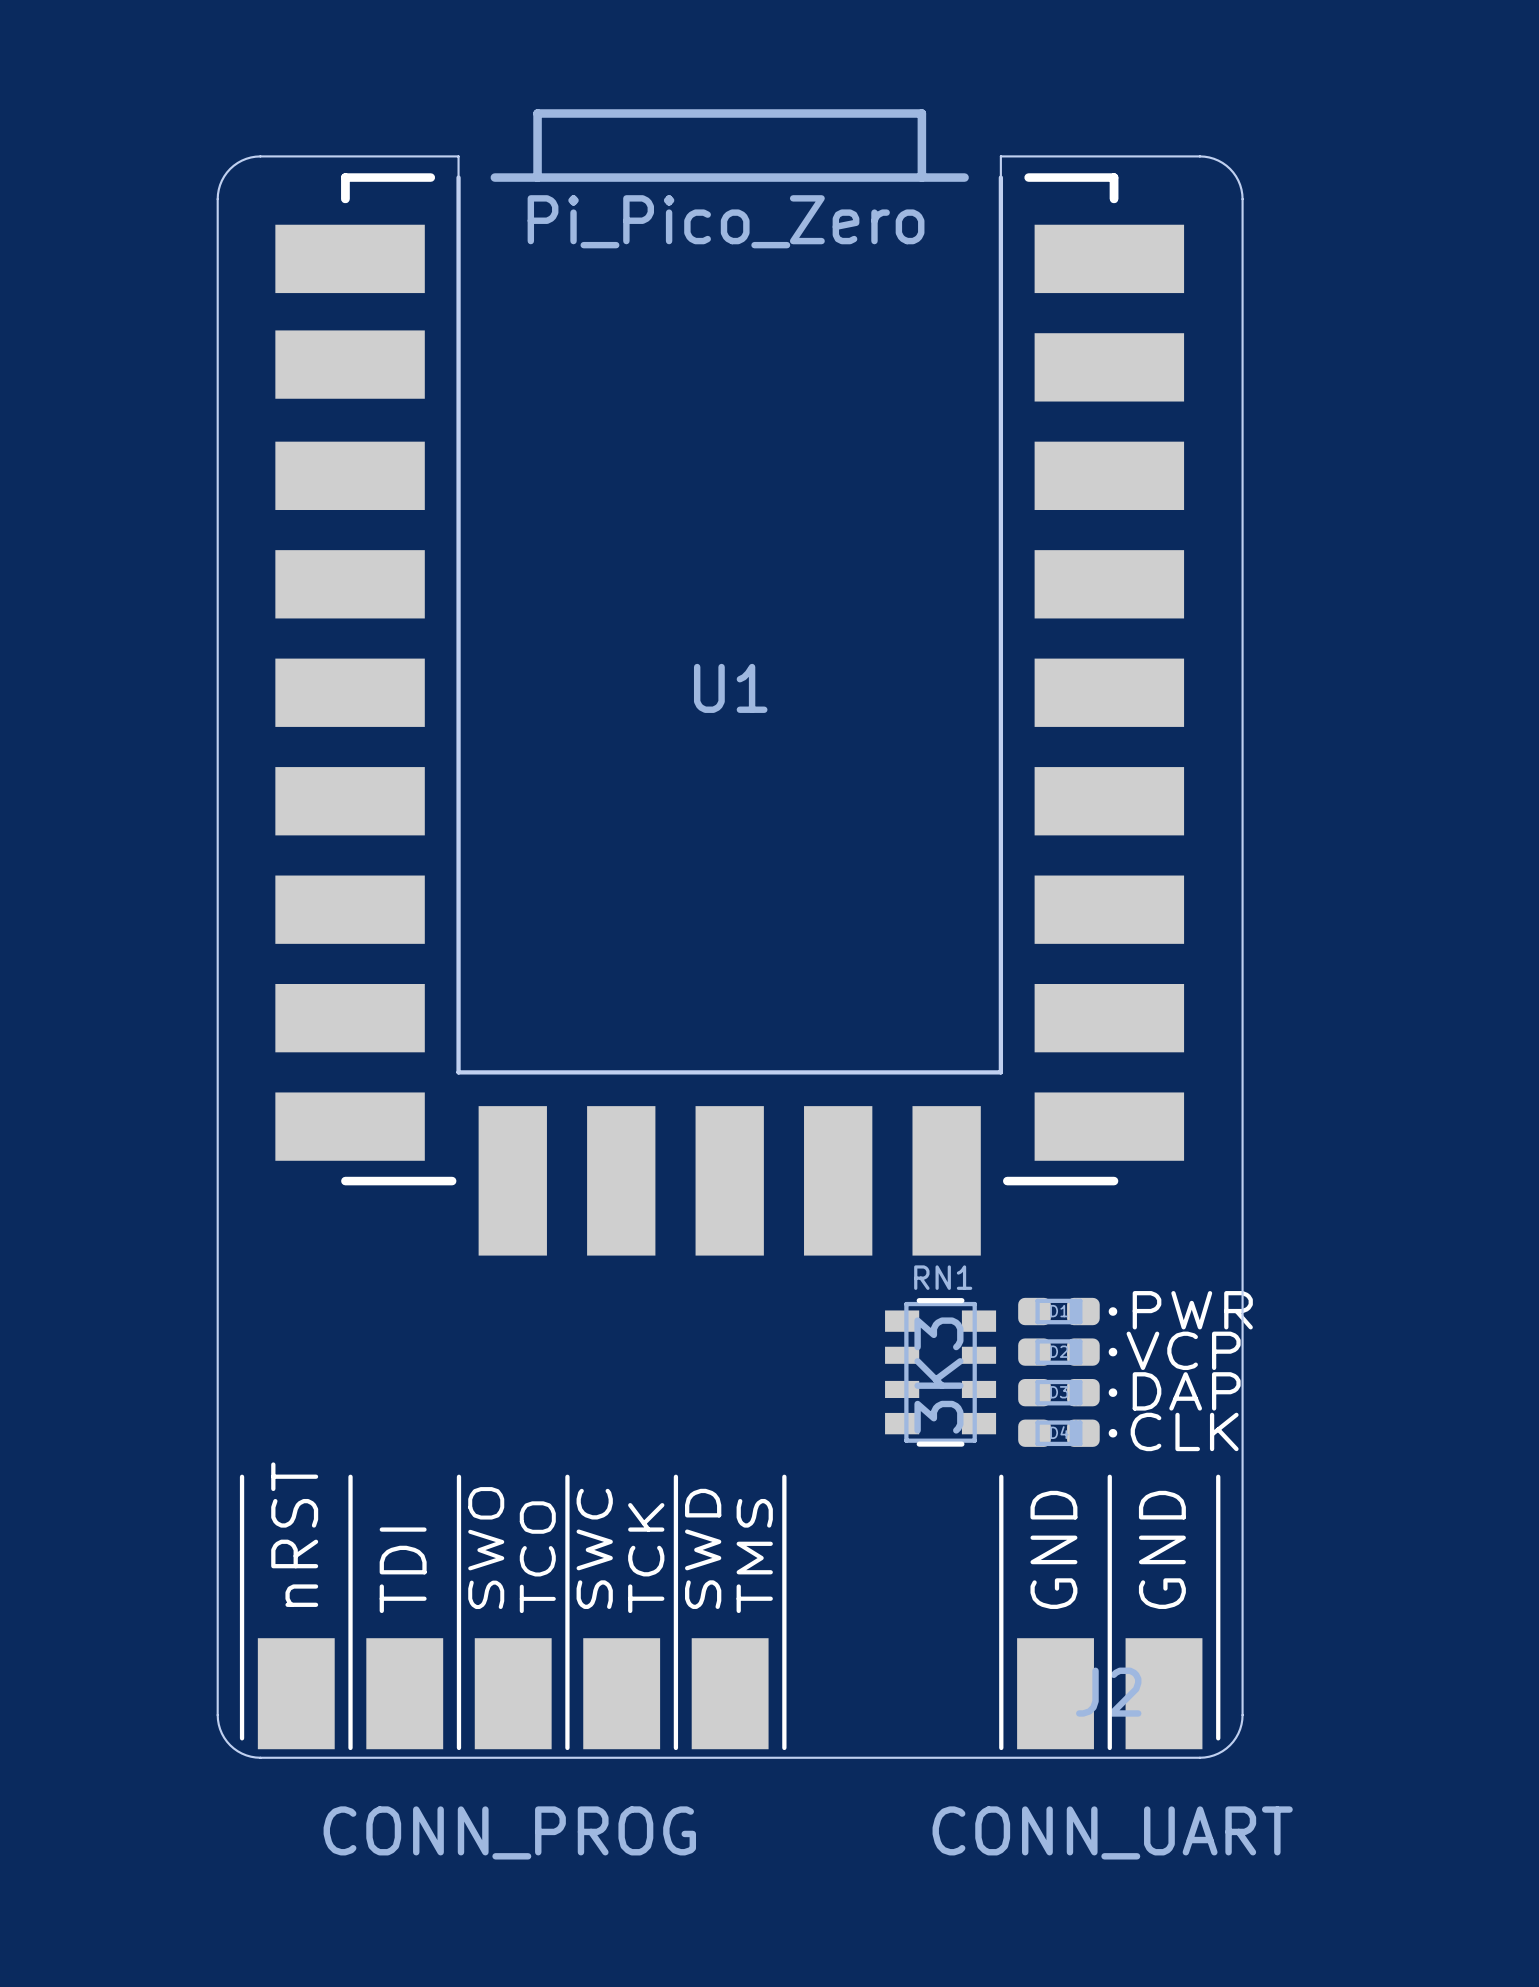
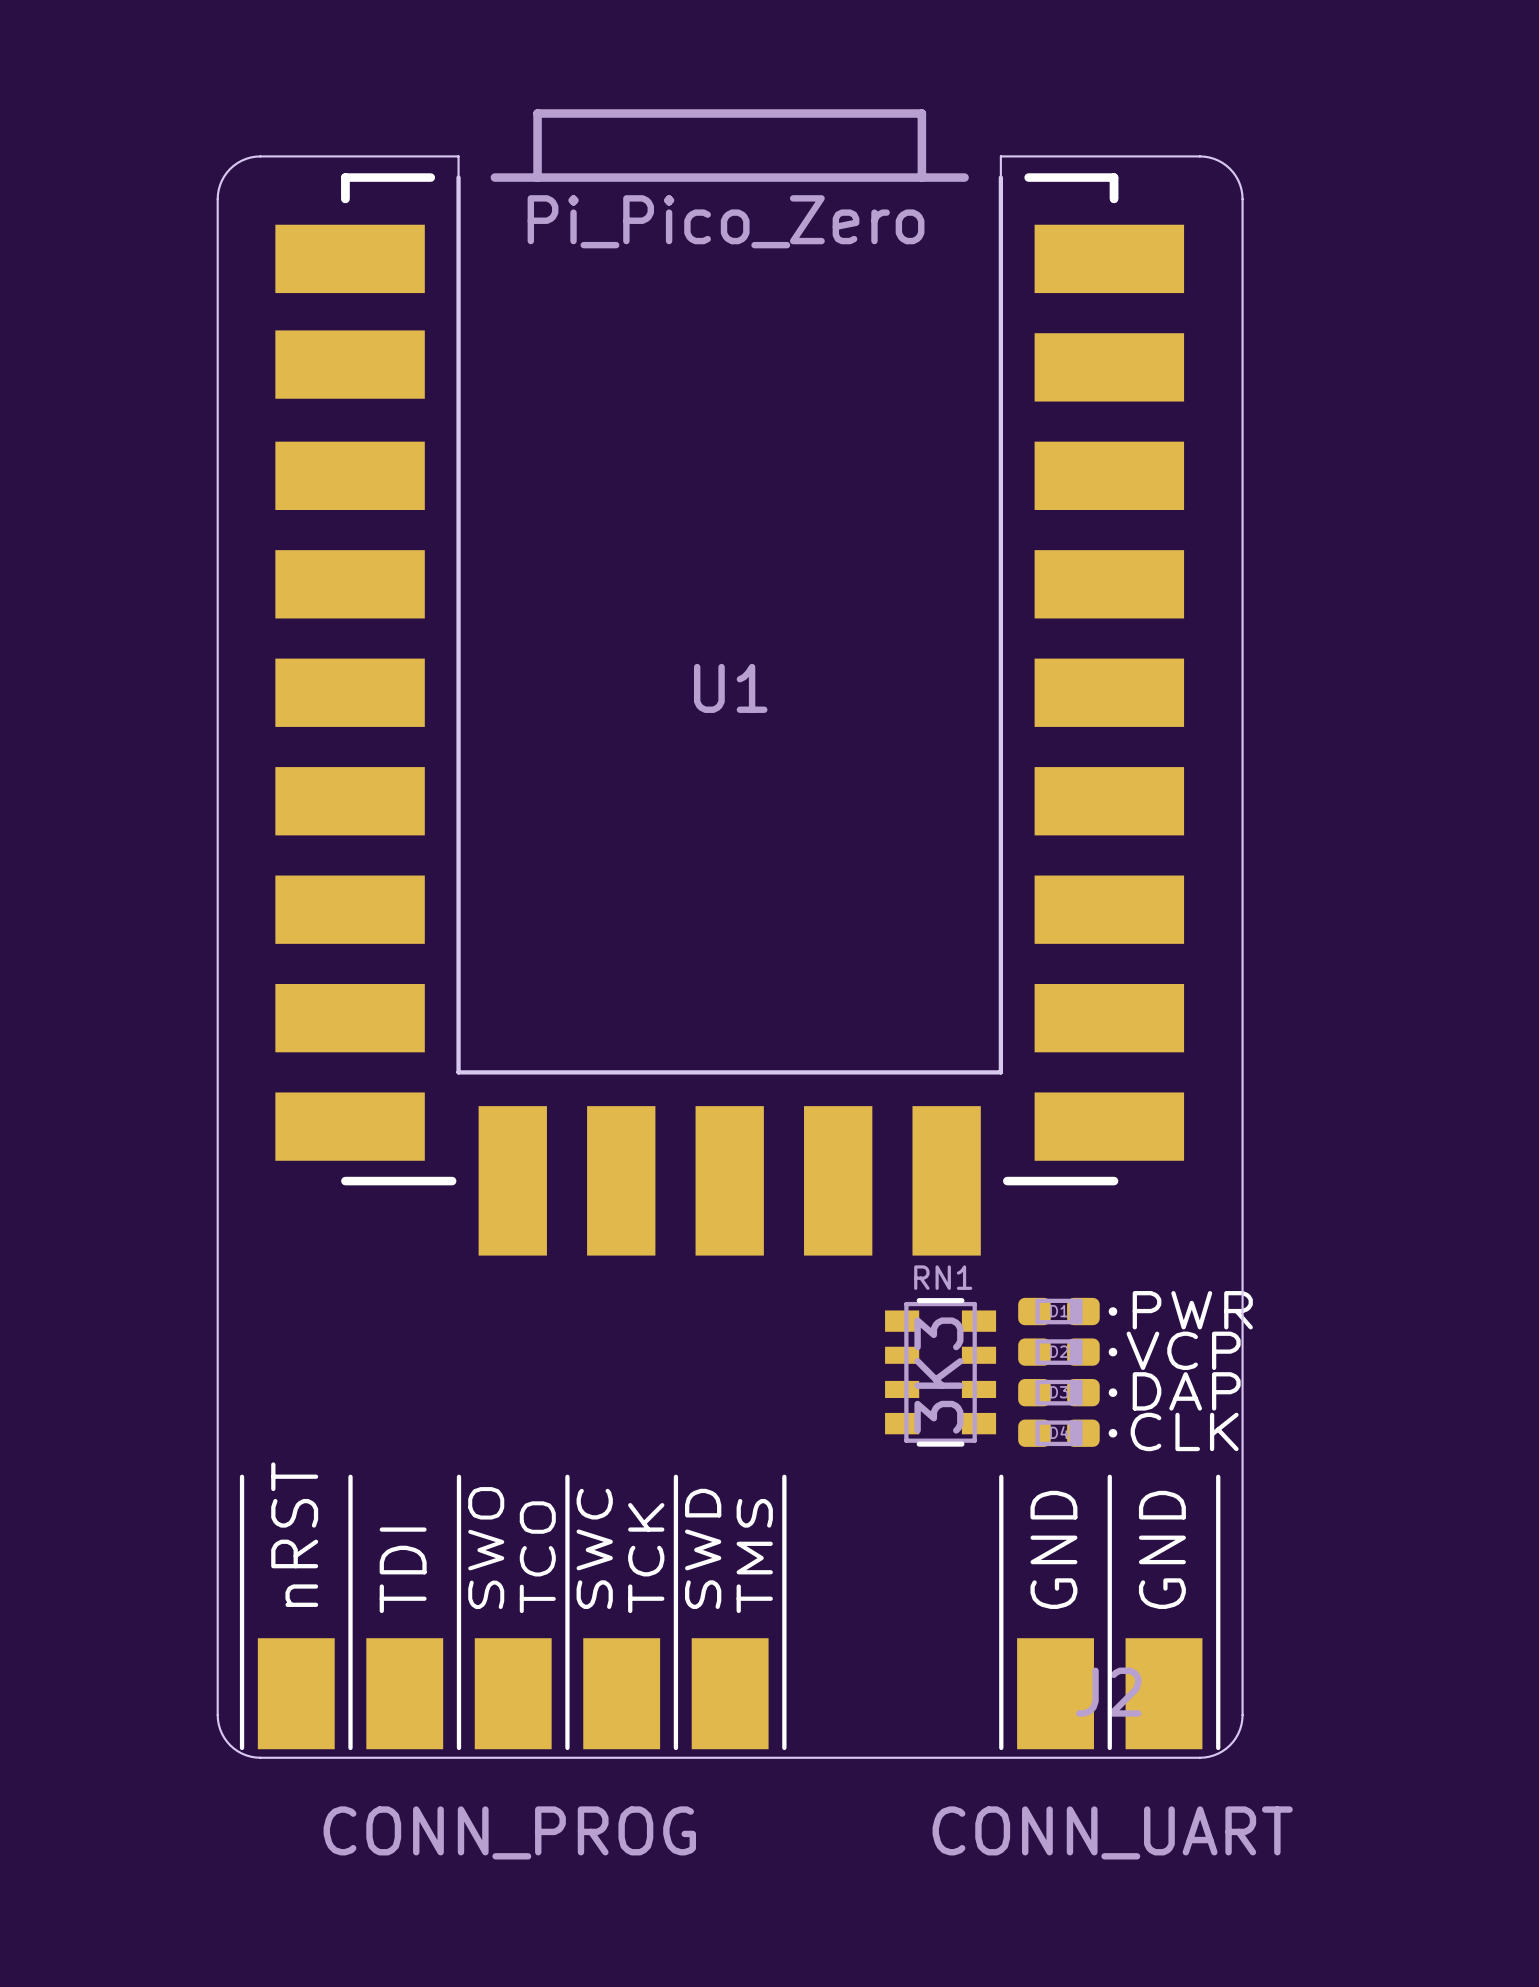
line: none -> (242, 1738) (242, 1747)
line: none -> (1218, 1738) (1218, 1747)

